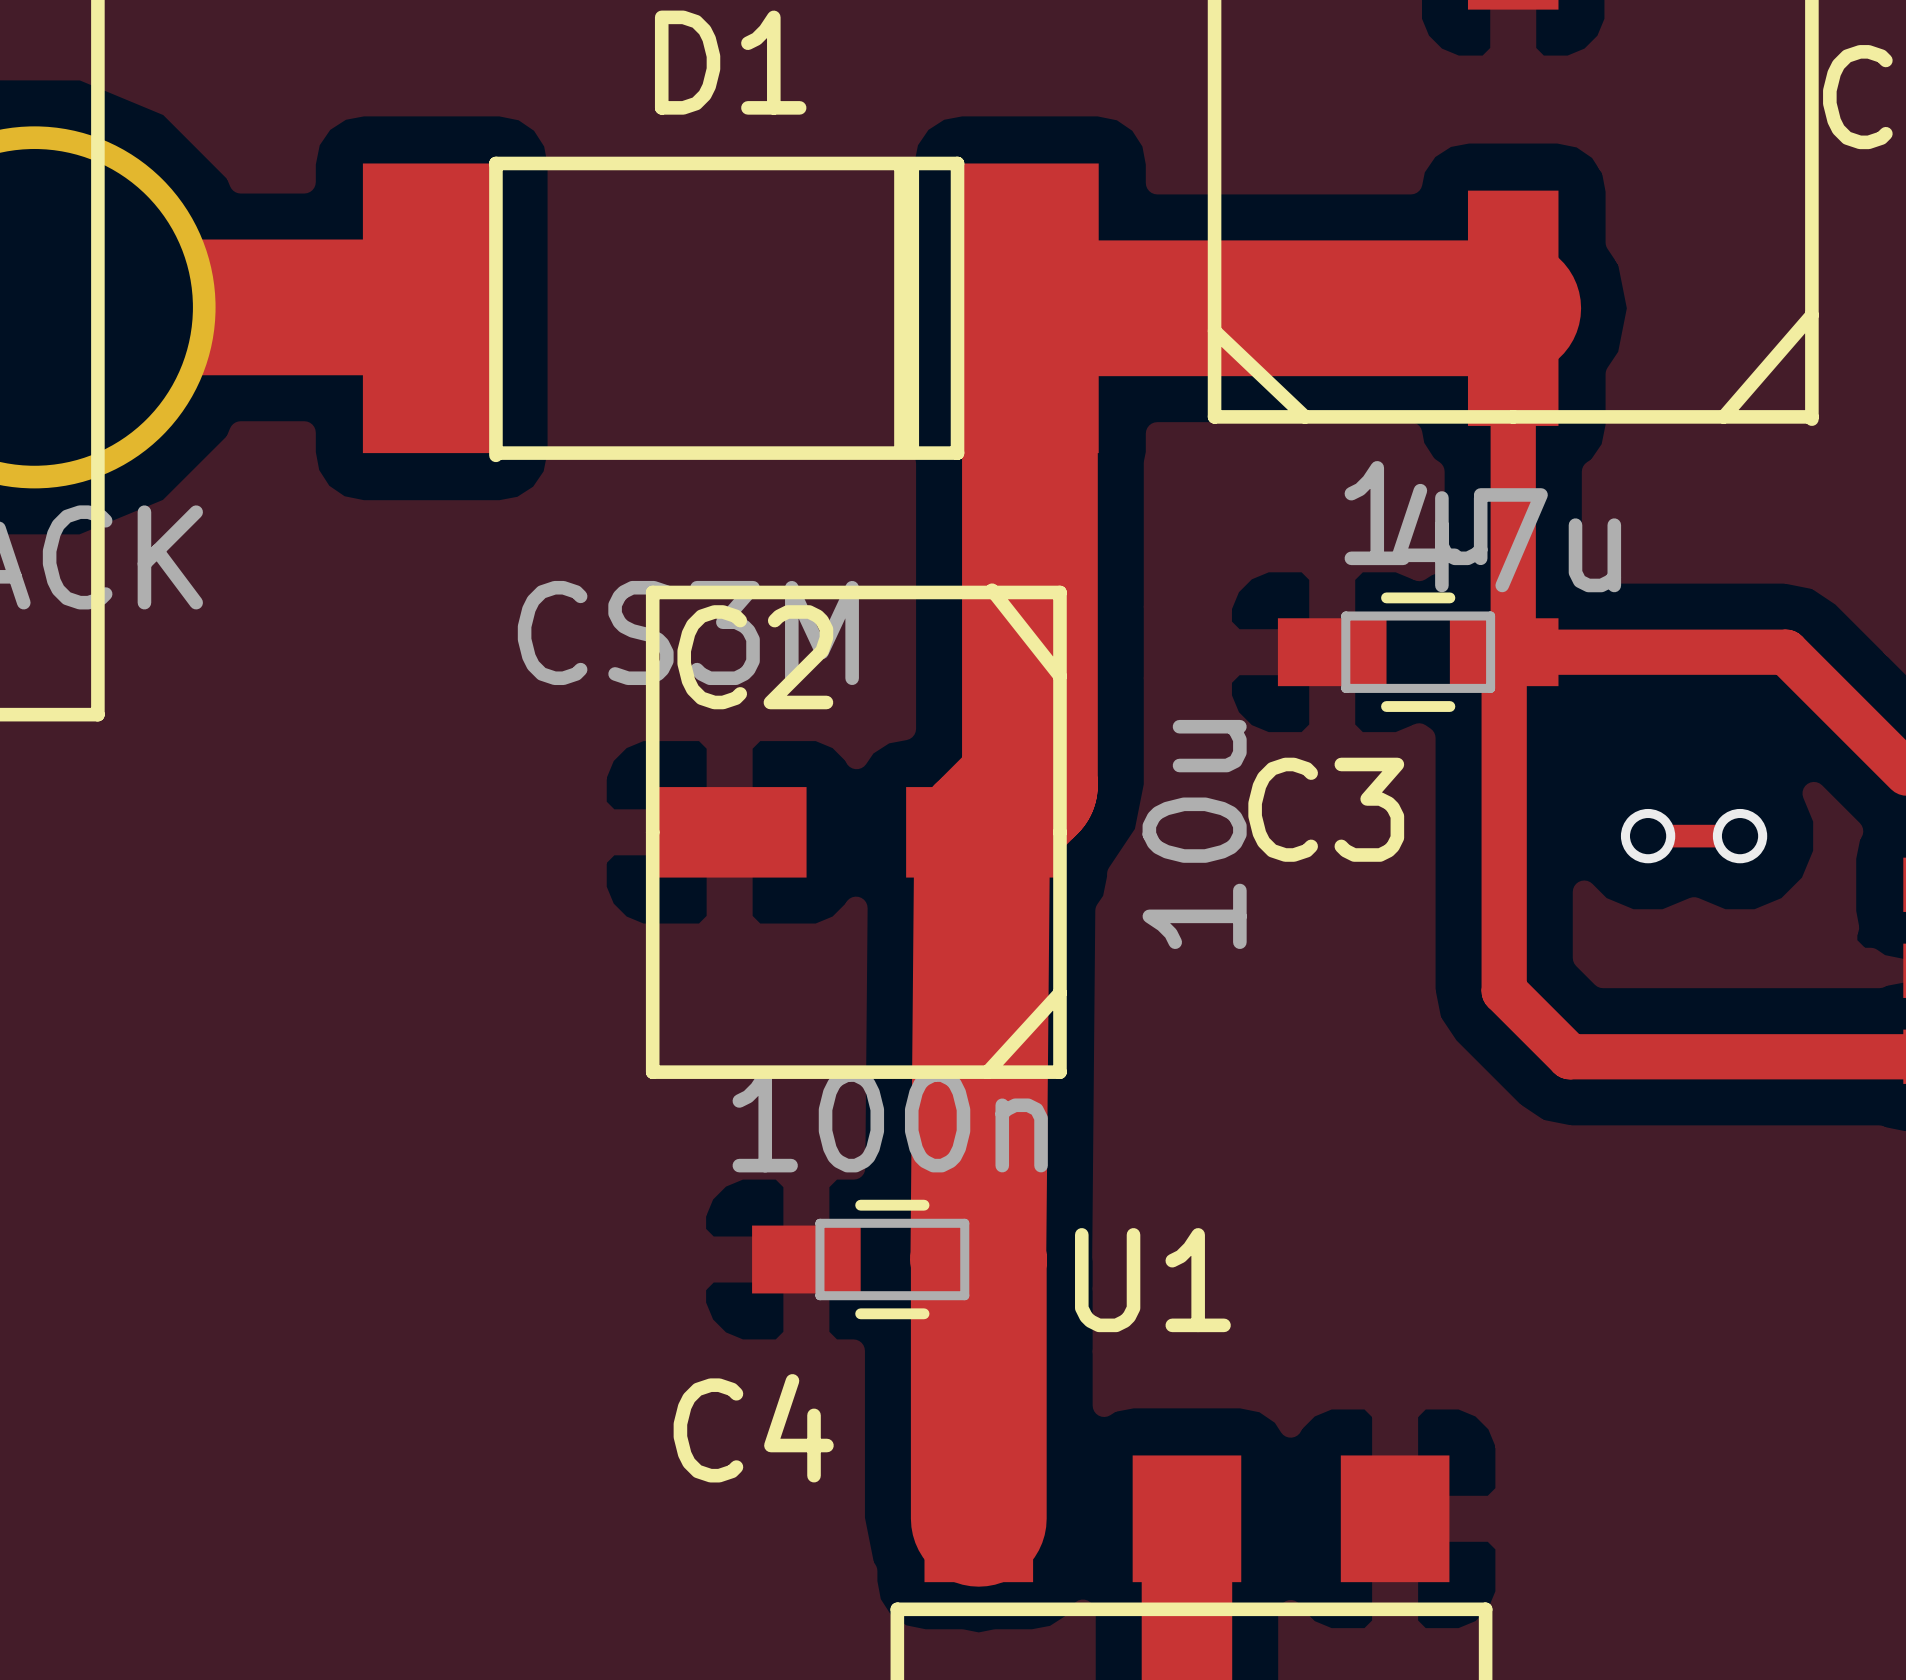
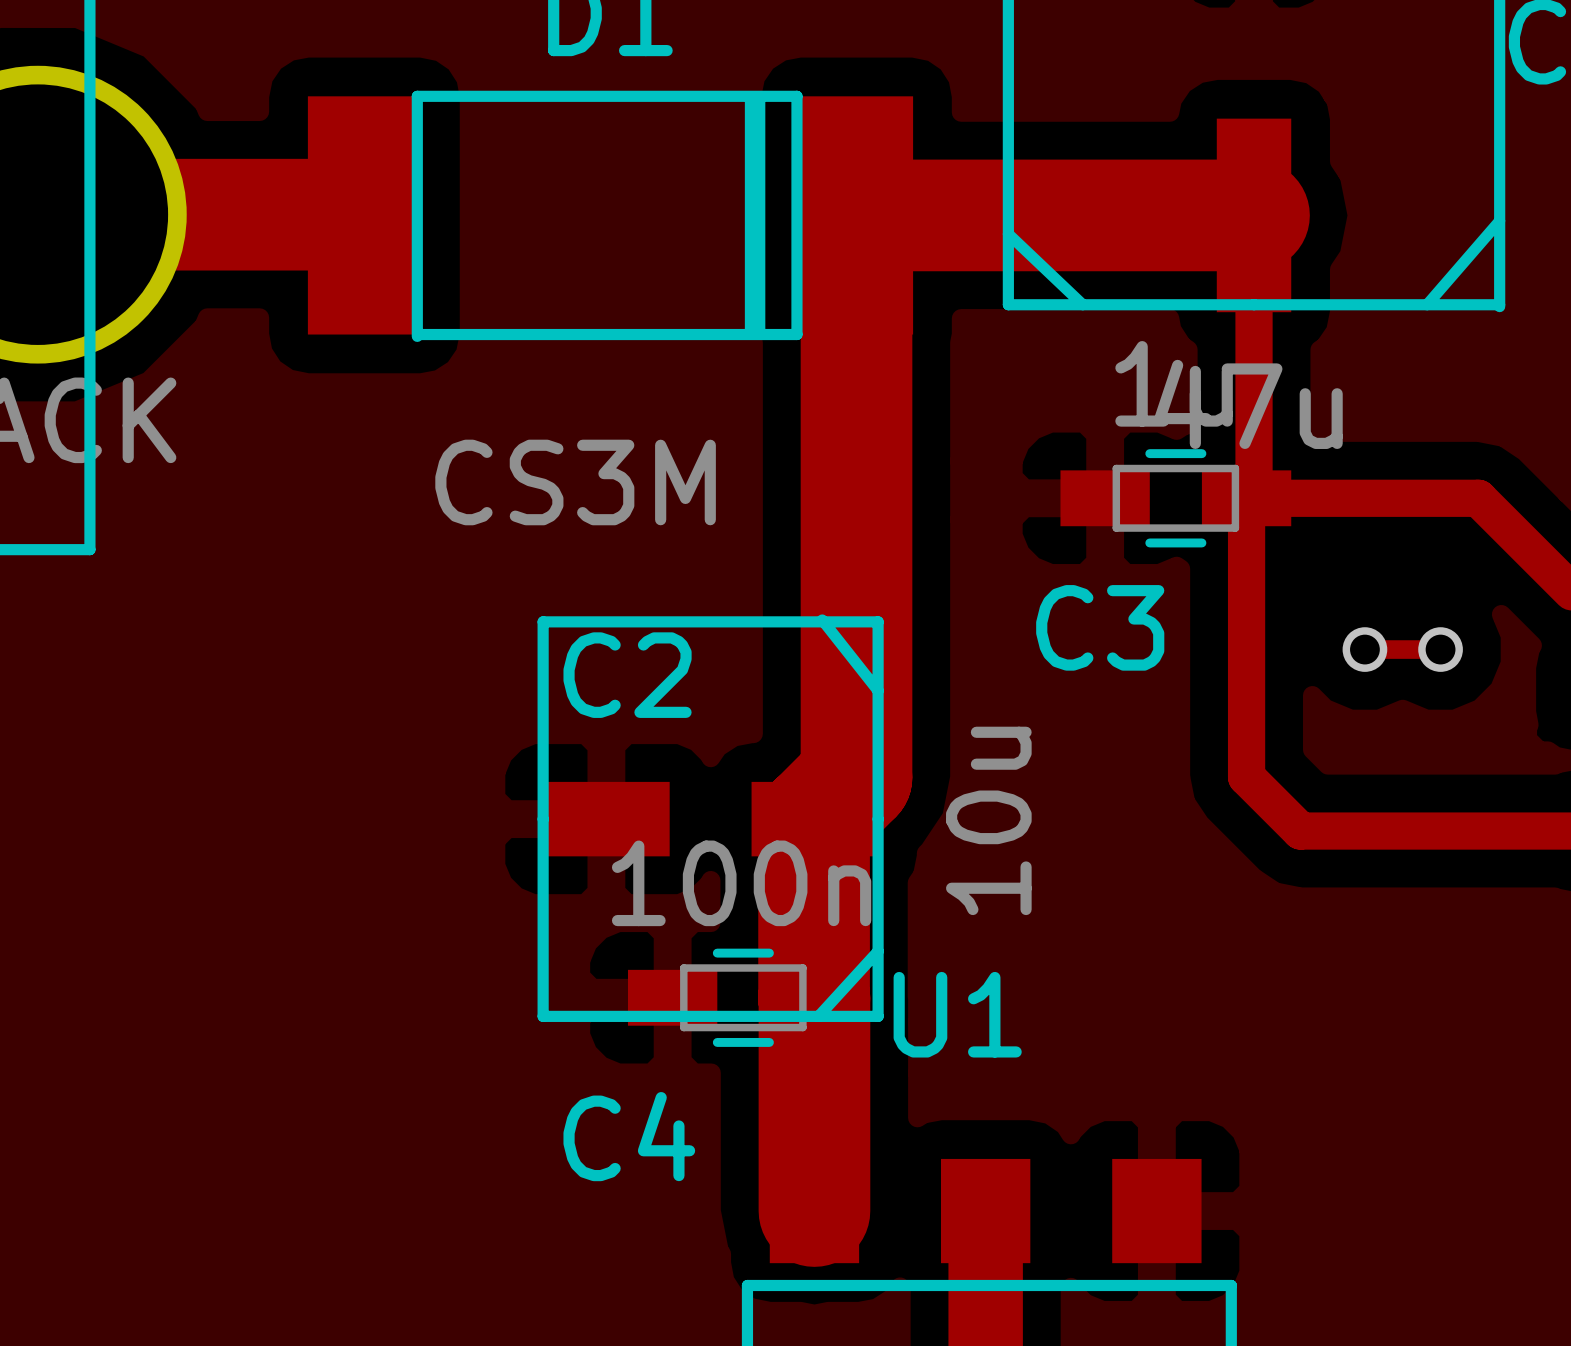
track: (1029, 785) (982, 833) (978, 1259) -> (856, 607) (856, 777) (814, 819) (814, 997)
C2 position: (856, 831) -> (710, 818)

